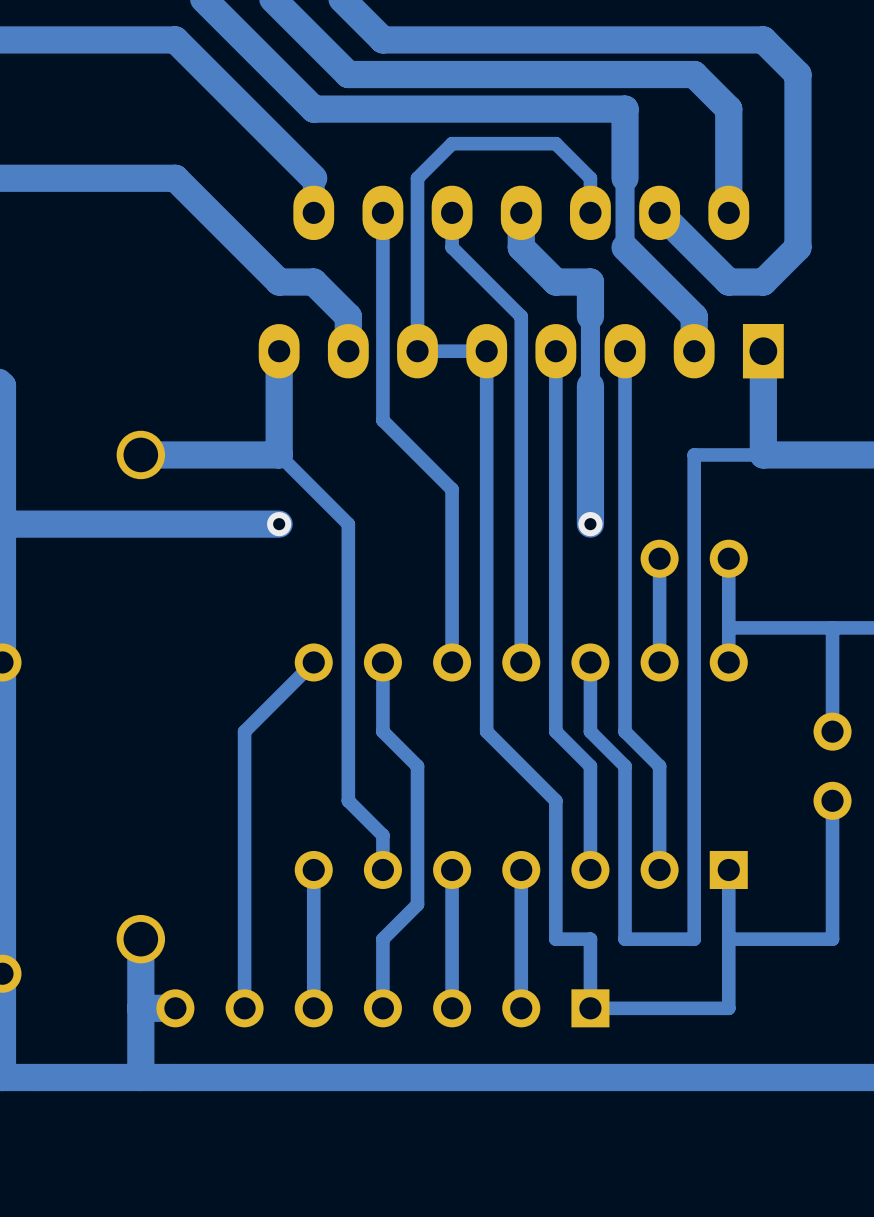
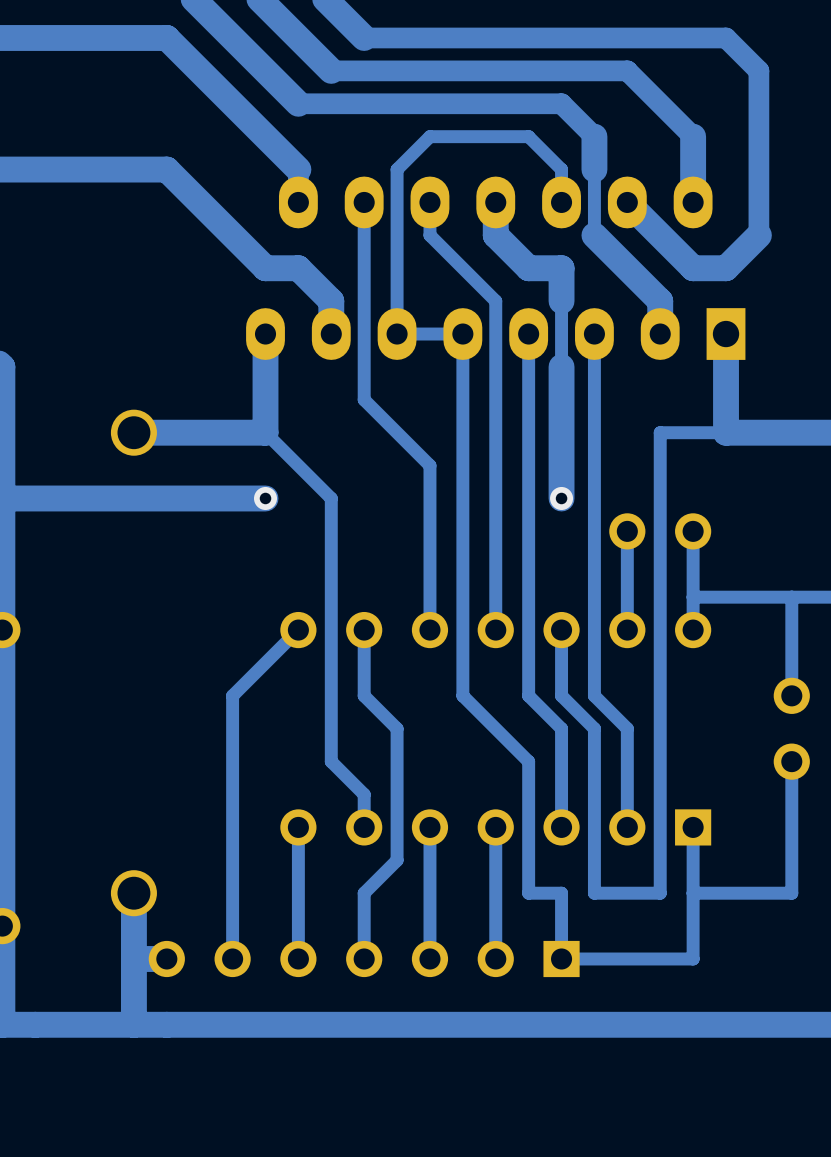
track width: thick (382, 39) (763, 39) (797, 74) (797, 247) -> thin (364, 37) (726, 37) (758, 70) (758, 235)
track: (659, 74) (694, 74) (728, 109) (728, 143) -> (627, 70) (693, 136)
track width: thick (659, 74) (348, 74) -> thin (627, 70) (331, 70)
track: (590, 109) (625, 109) (625, 143) -> (561, 103) (594, 136)
track width: thick (590, 109) (313, 109) -> thin (561, 103) (298, 103)
track width: thick (625, 178) (625, 247) -> thin (594, 169) (594, 235)
track width: thick (590, 316) (590, 385) -> thin (561, 301) (561, 366)

